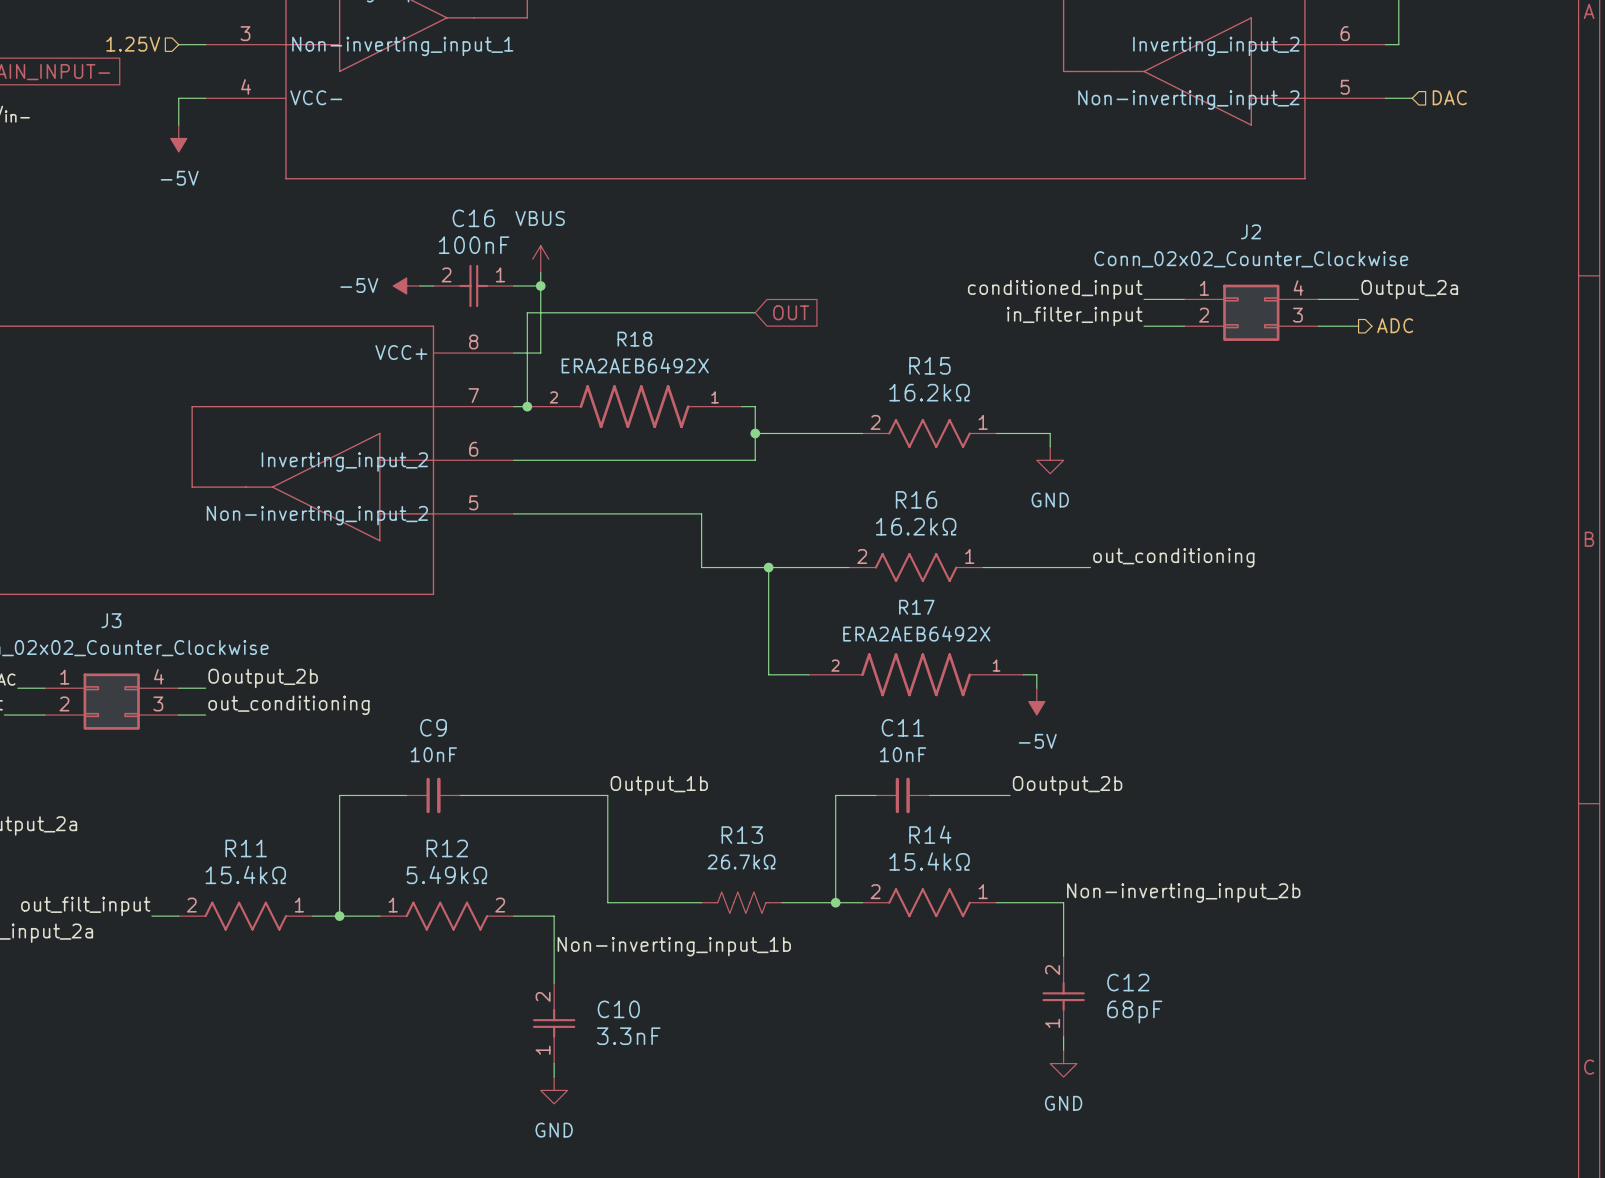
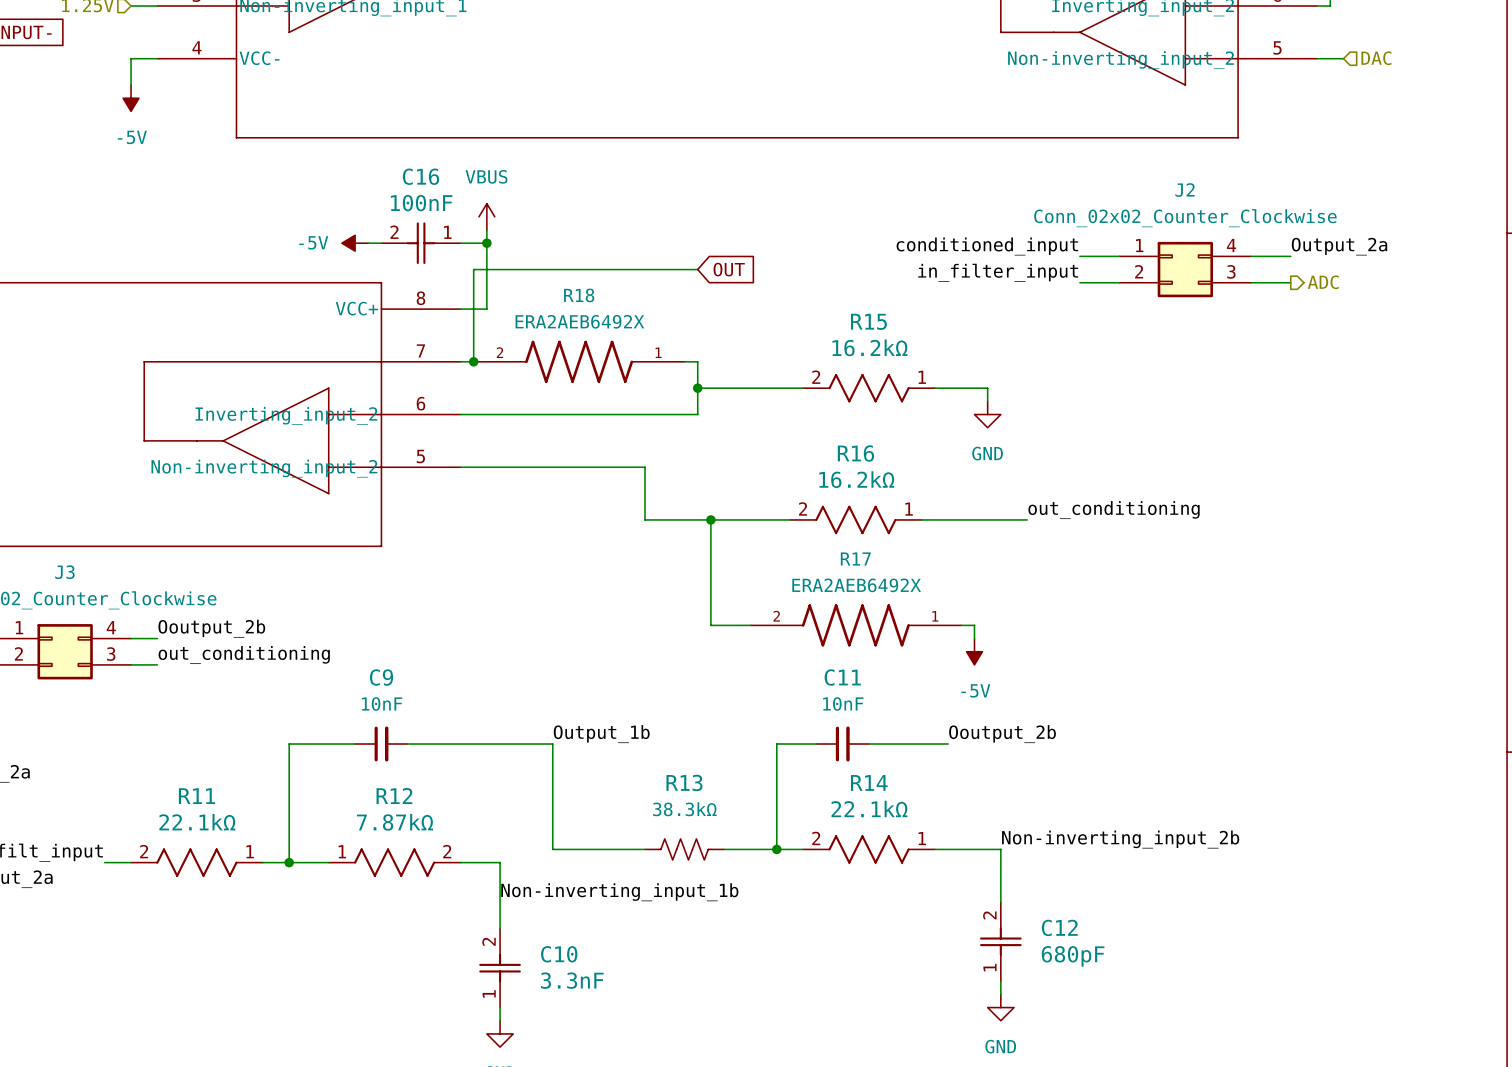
R14 value: 15.4kΩ (929, 861) -> 22.1kΩ (869, 808)
R13 value: 26.7kΩ (741, 862) -> 38.3kΩ (684, 809)
R11 value: 15.4kΩ (245, 874) -> 22.1kΩ (197, 822)
R12 value: 5.49kΩ (446, 874) -> 7.87kΩ (394, 822)
C12 value: 68pF (1134, 1012) -> 680pF (1073, 956)

